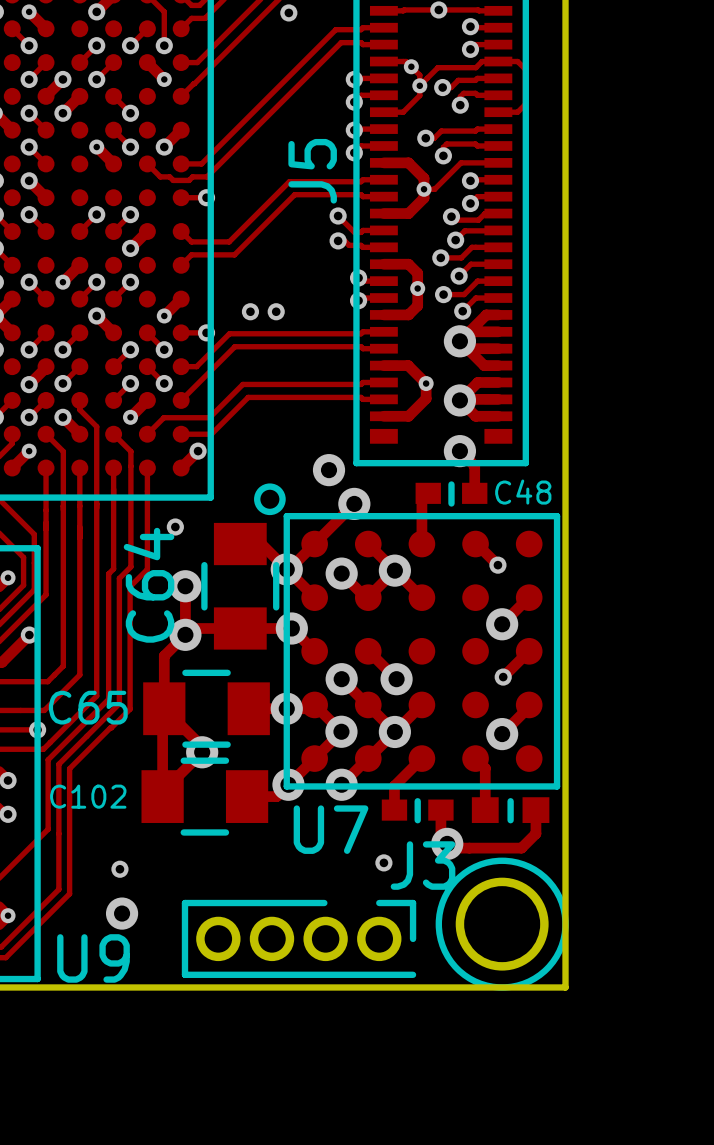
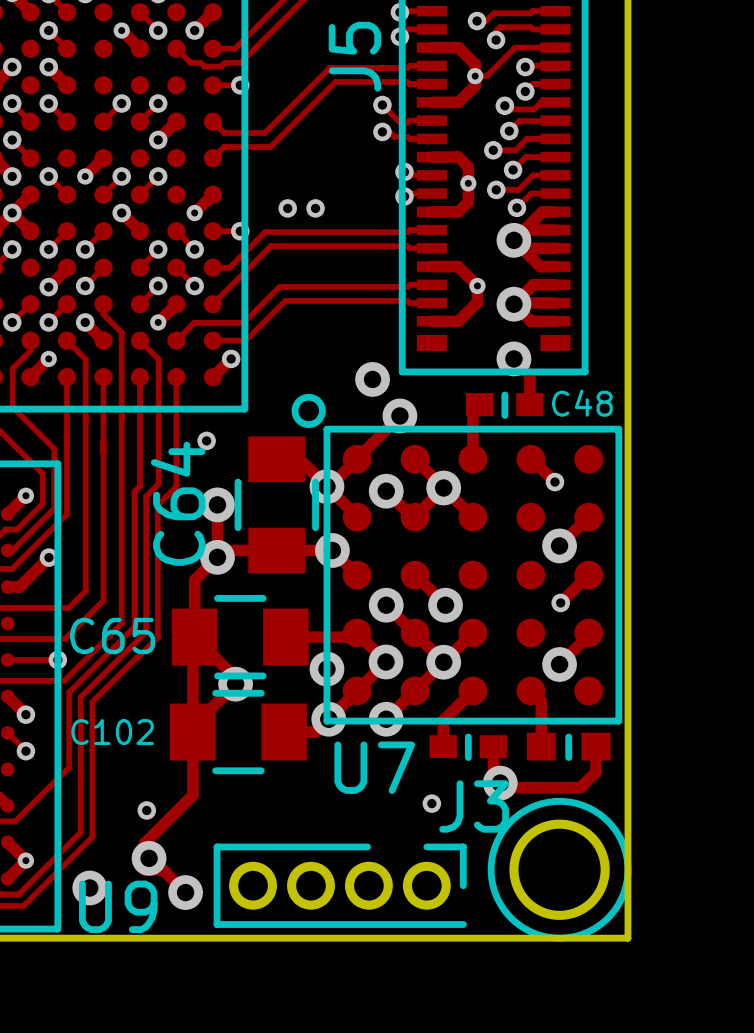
via position: (286, 708) -> (326, 669)
track: none -> (192, 732) (192, 795) (144, 843) (144, 869) (162, 869) (185, 892)
via: none -> (89, 888)
via: none -> (185, 892)

